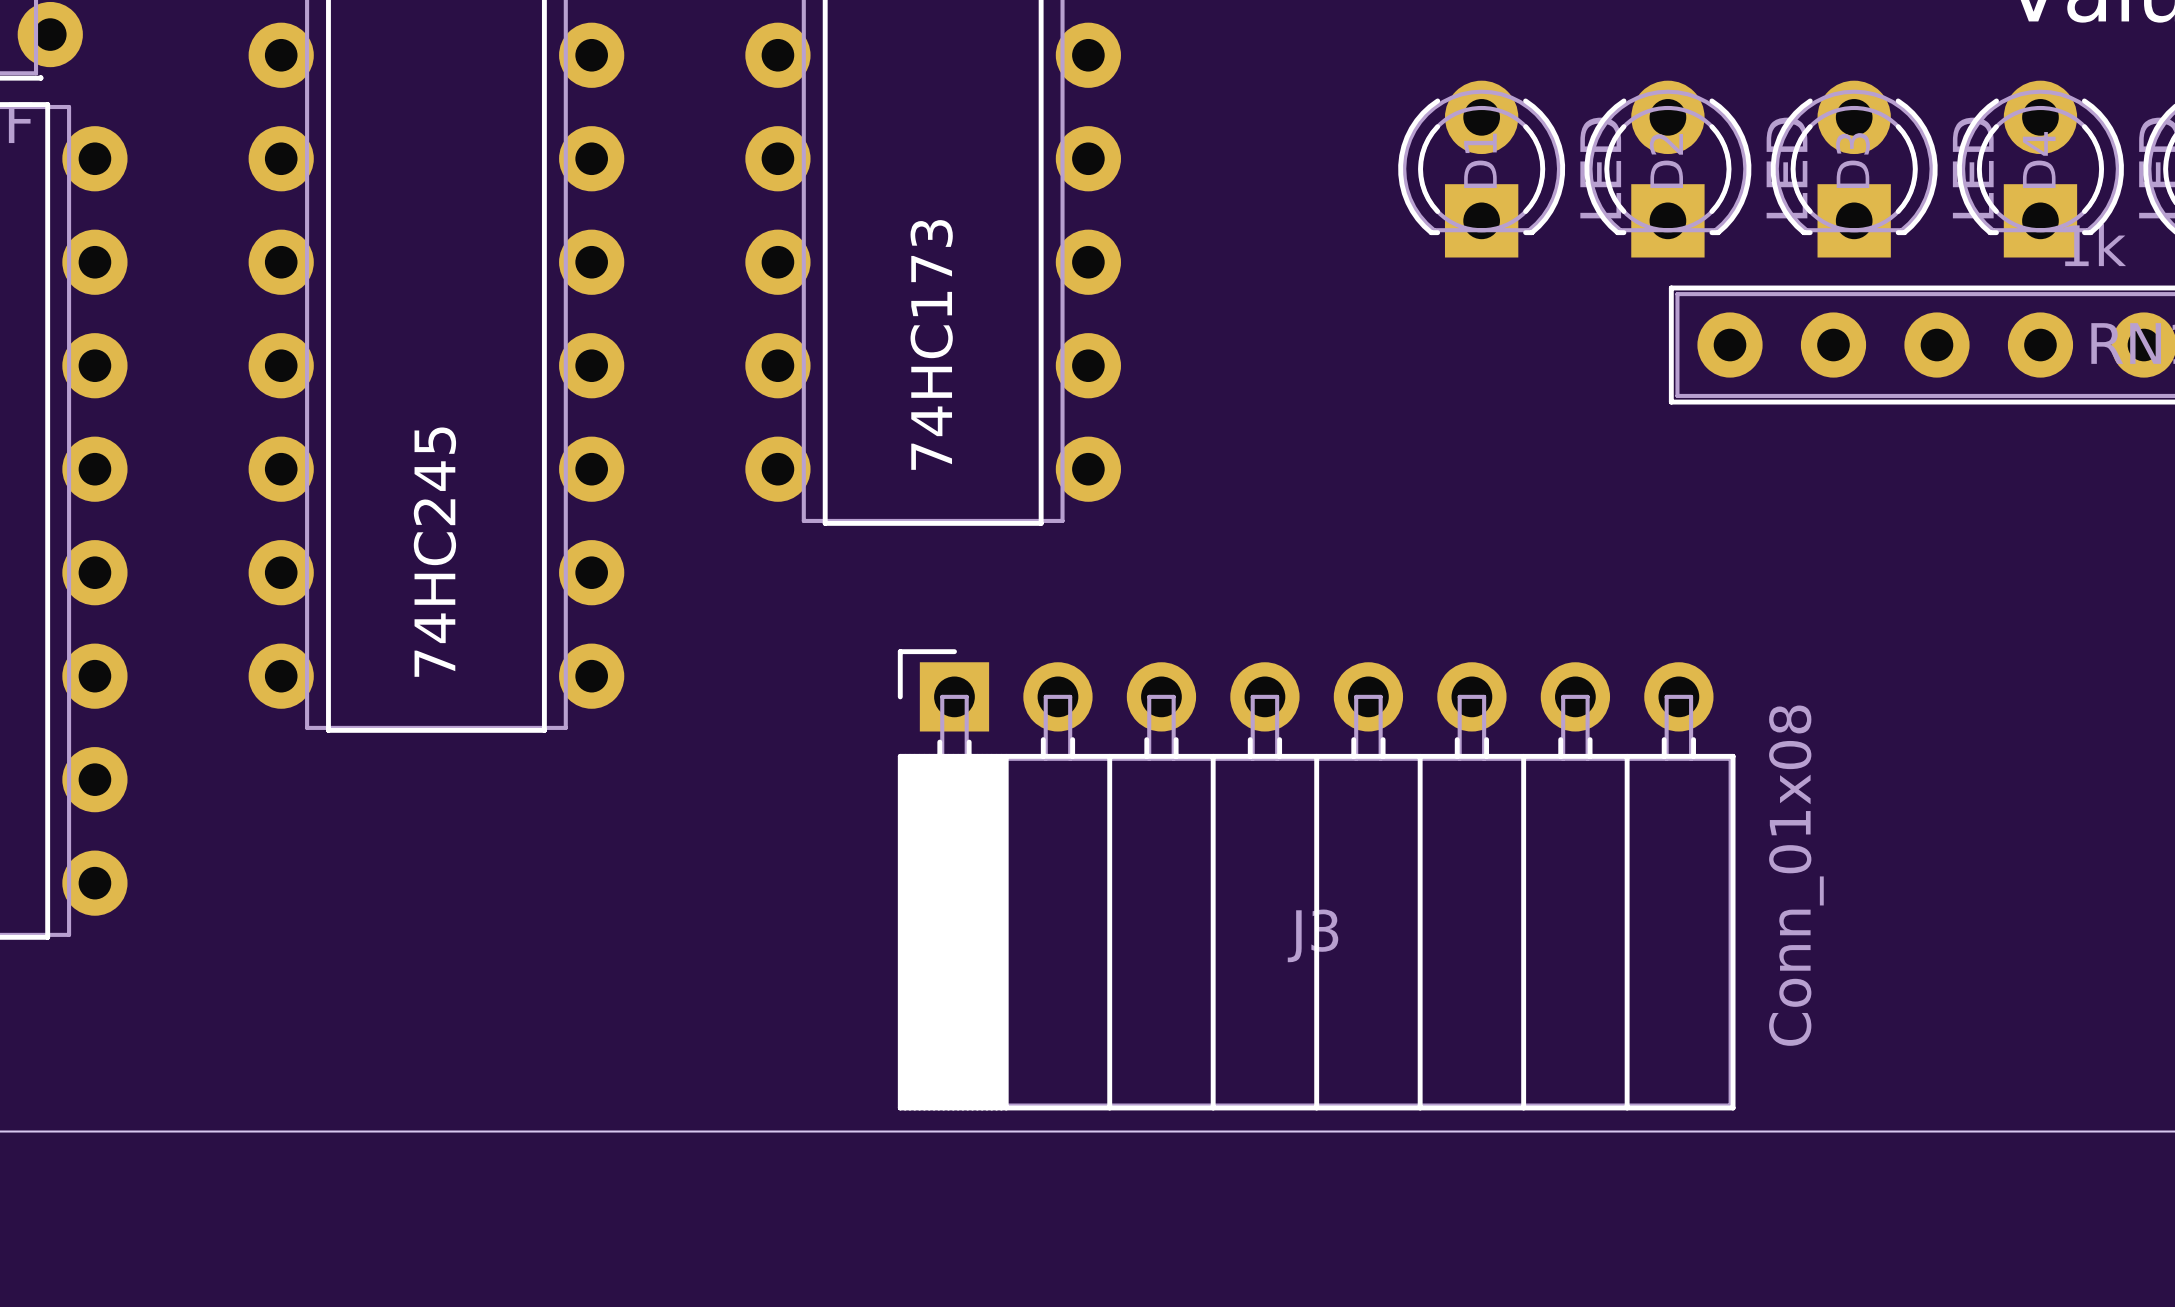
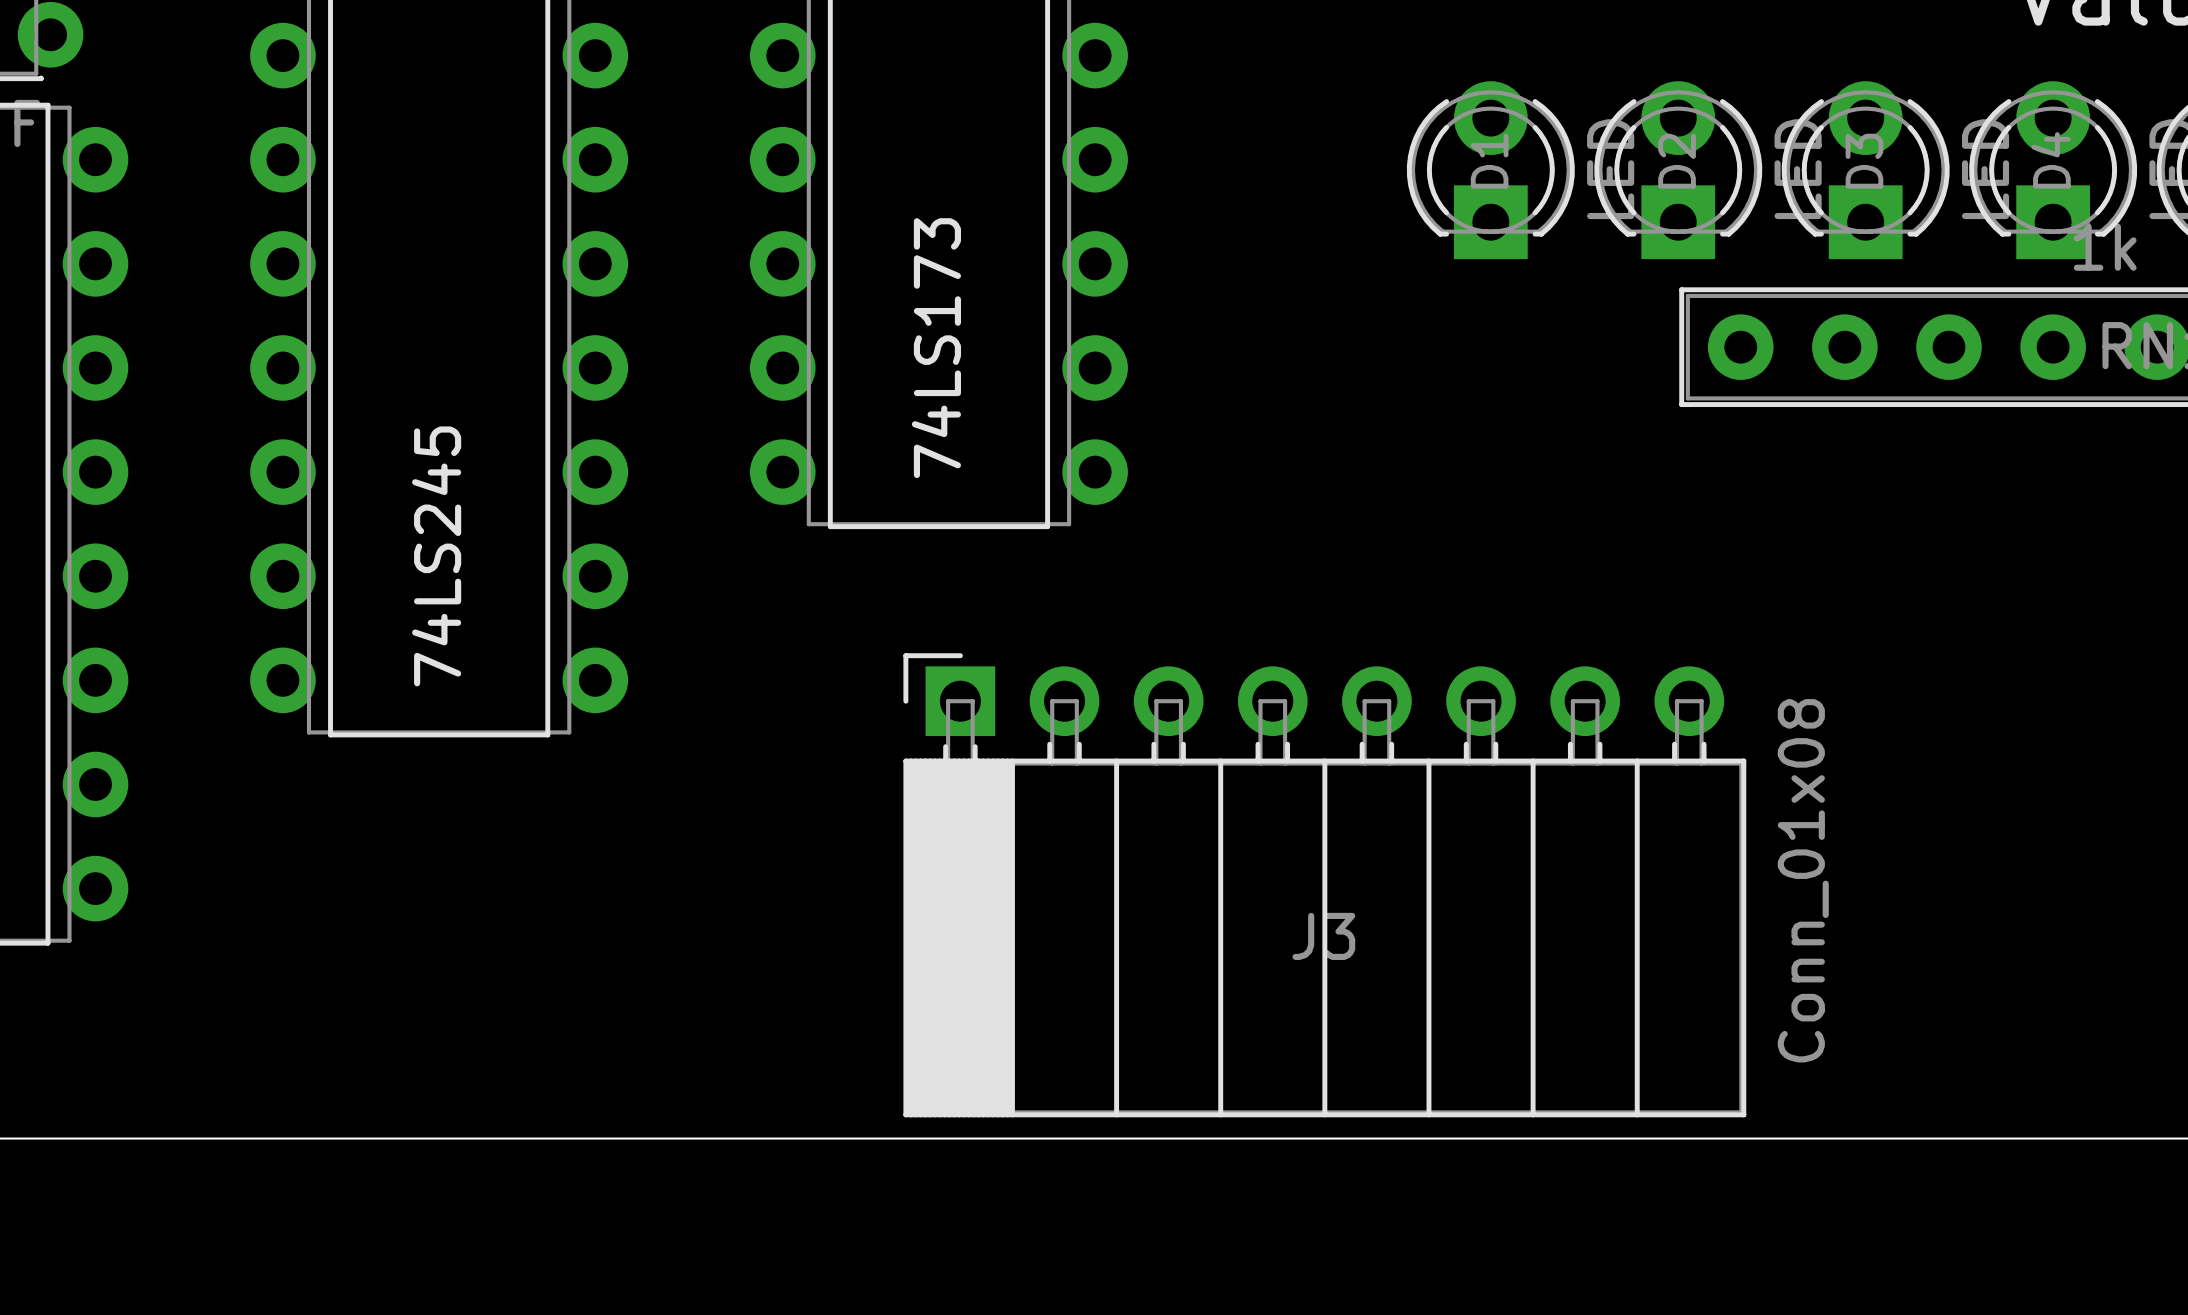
part value: 74HC173 (931, 344) -> 74LS173 (936, 348)
part value: 74HC245 (434, 552) -> 74LS245 (436, 556)

